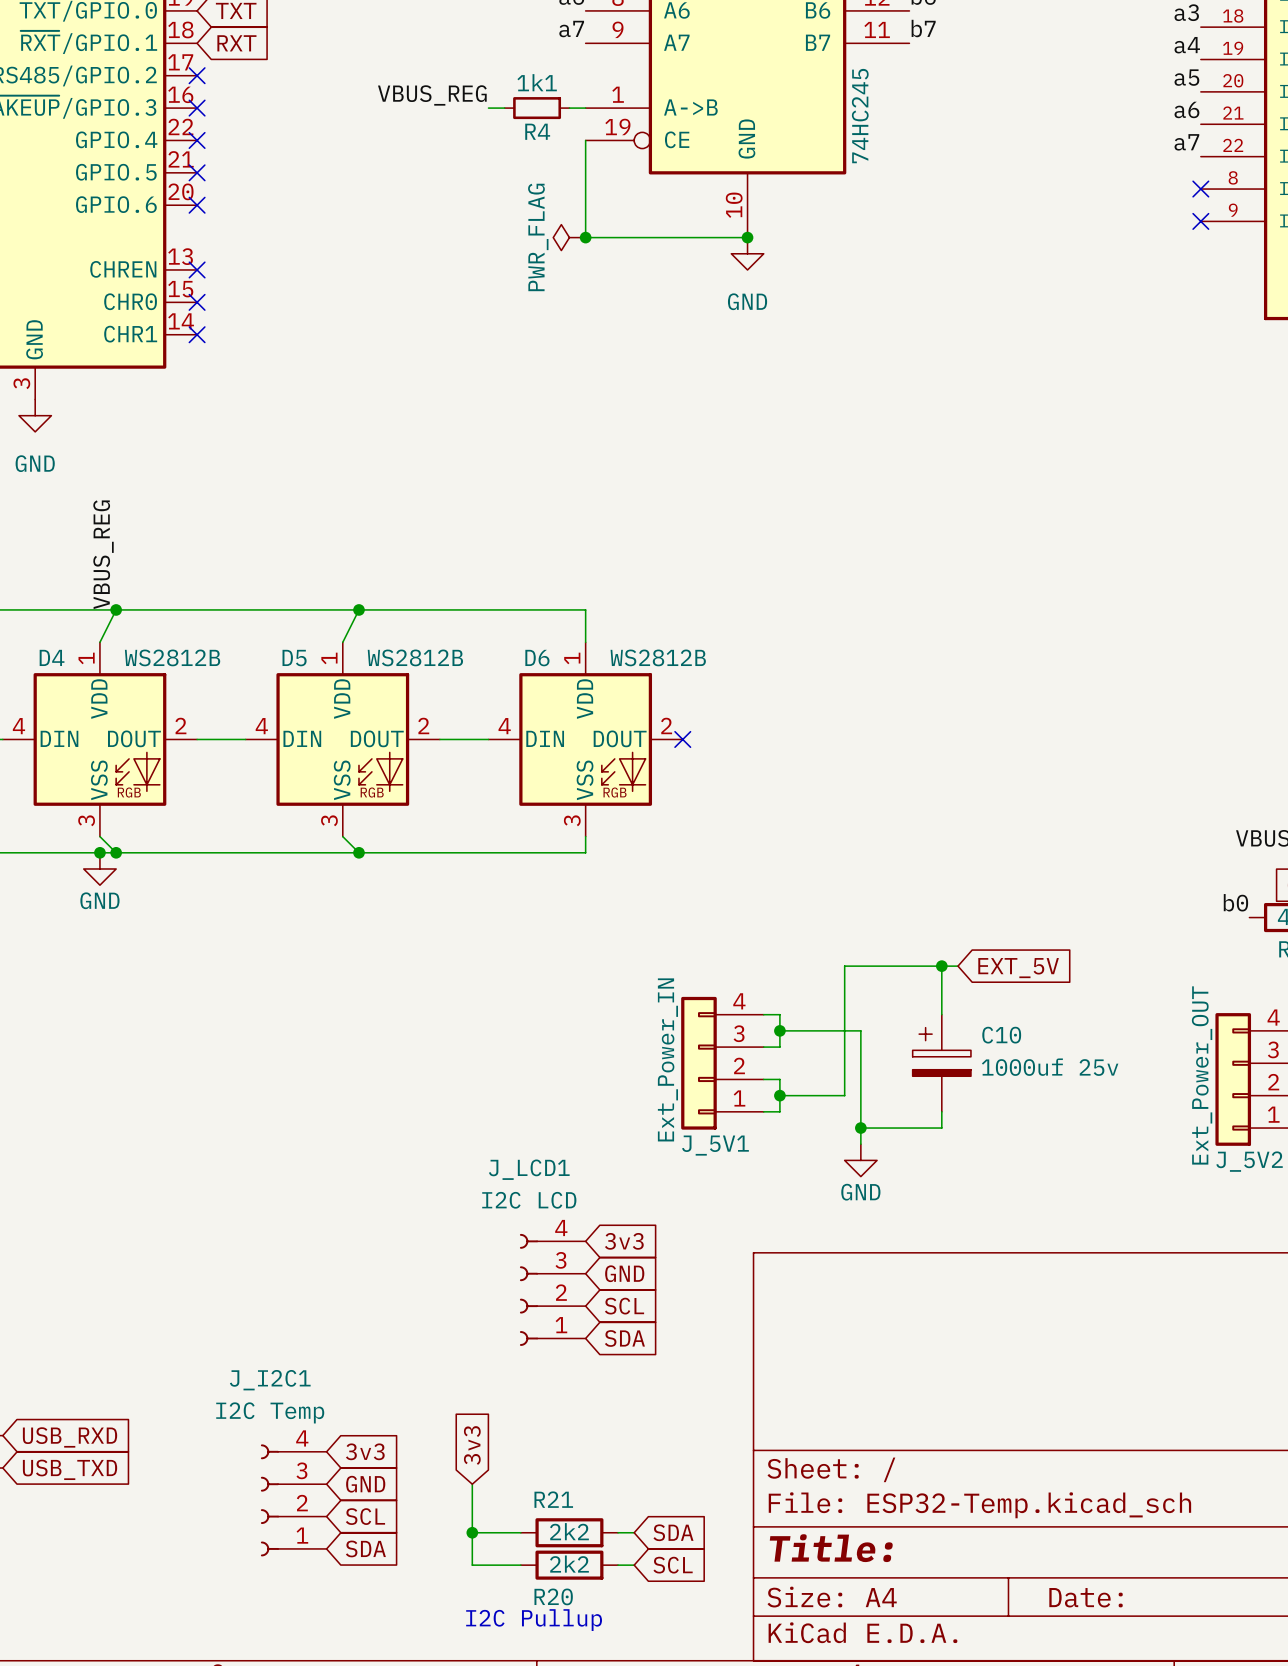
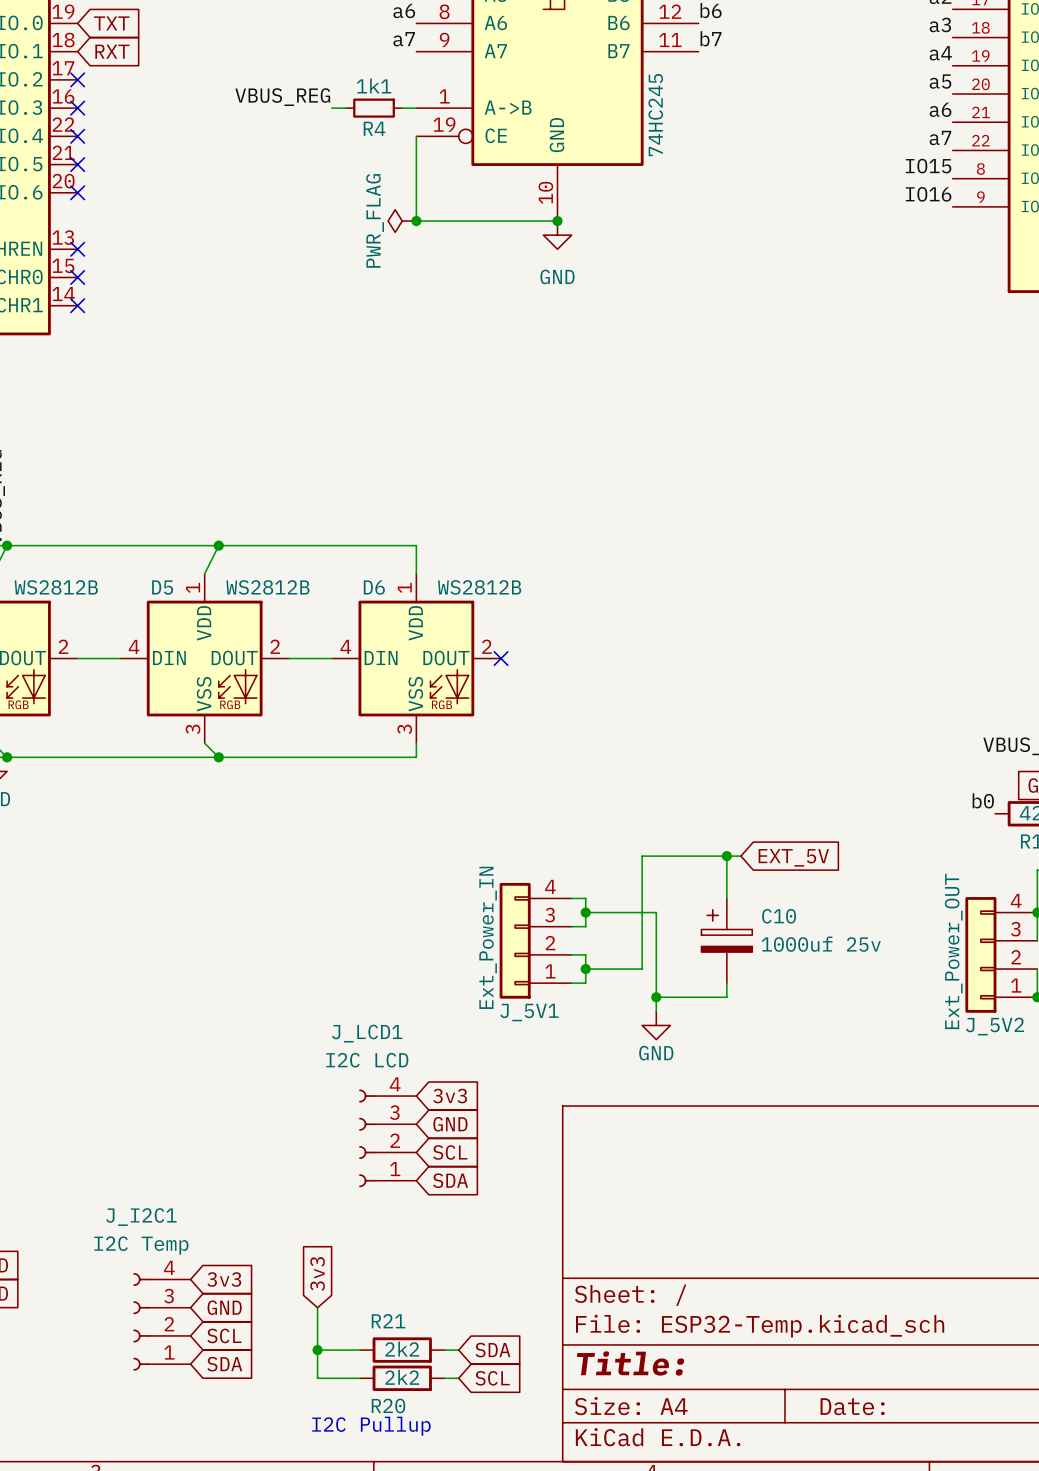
label: none -> IO15 (928, 166)
no-connect mark: (1200, 189) -> none
label: none -> IO16 (928, 194)
no-connect mark: (1200, 221) -> none

